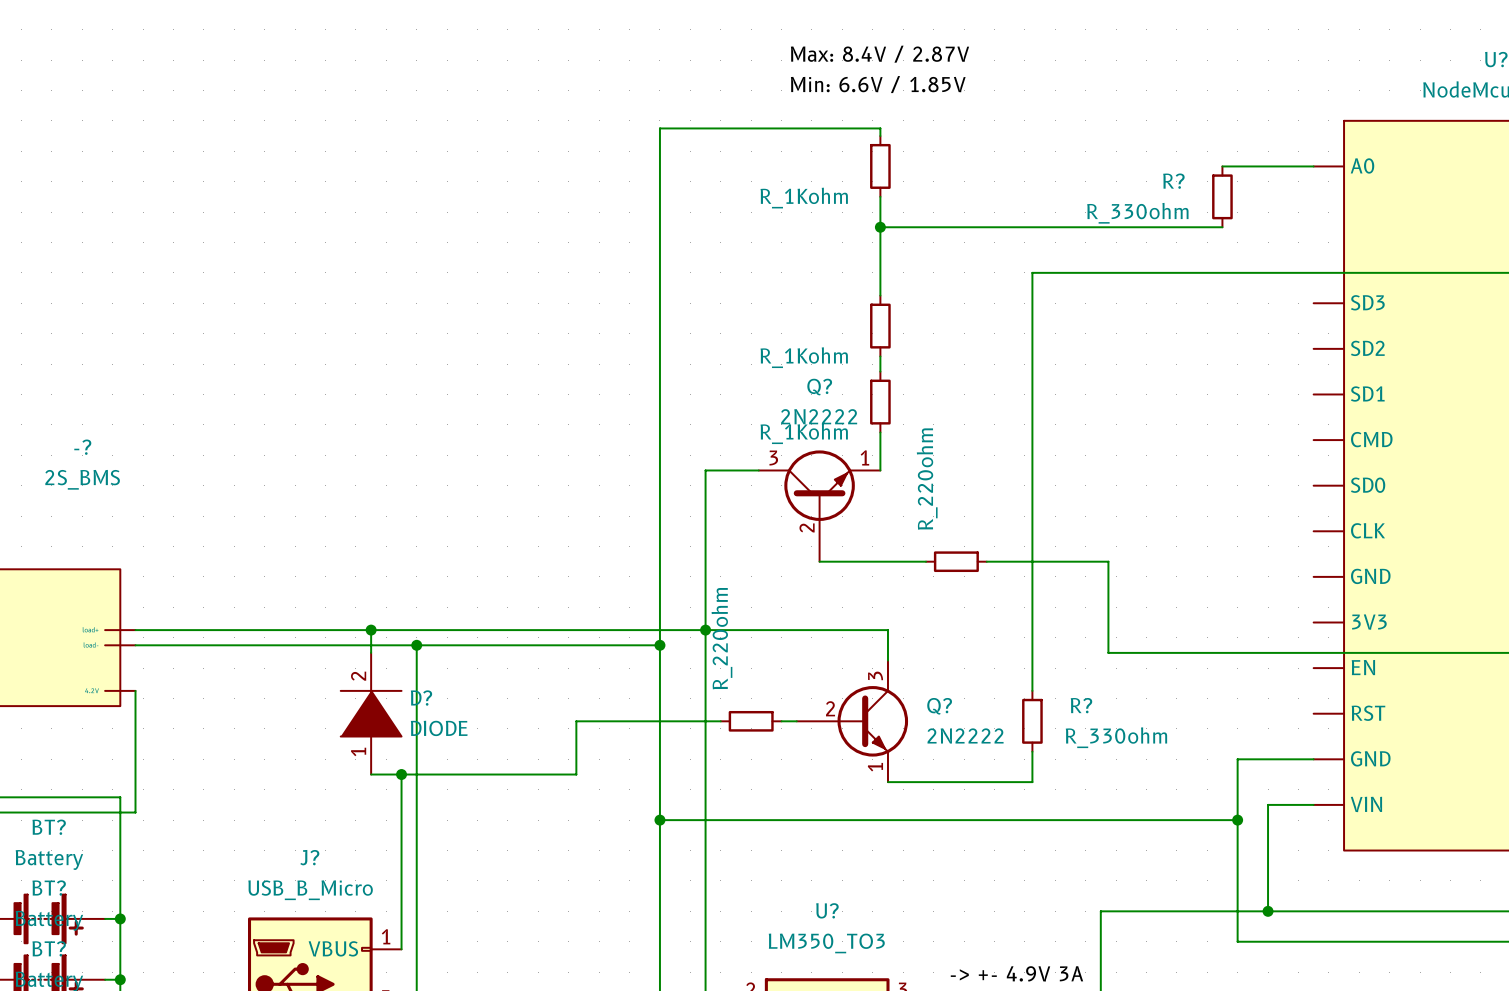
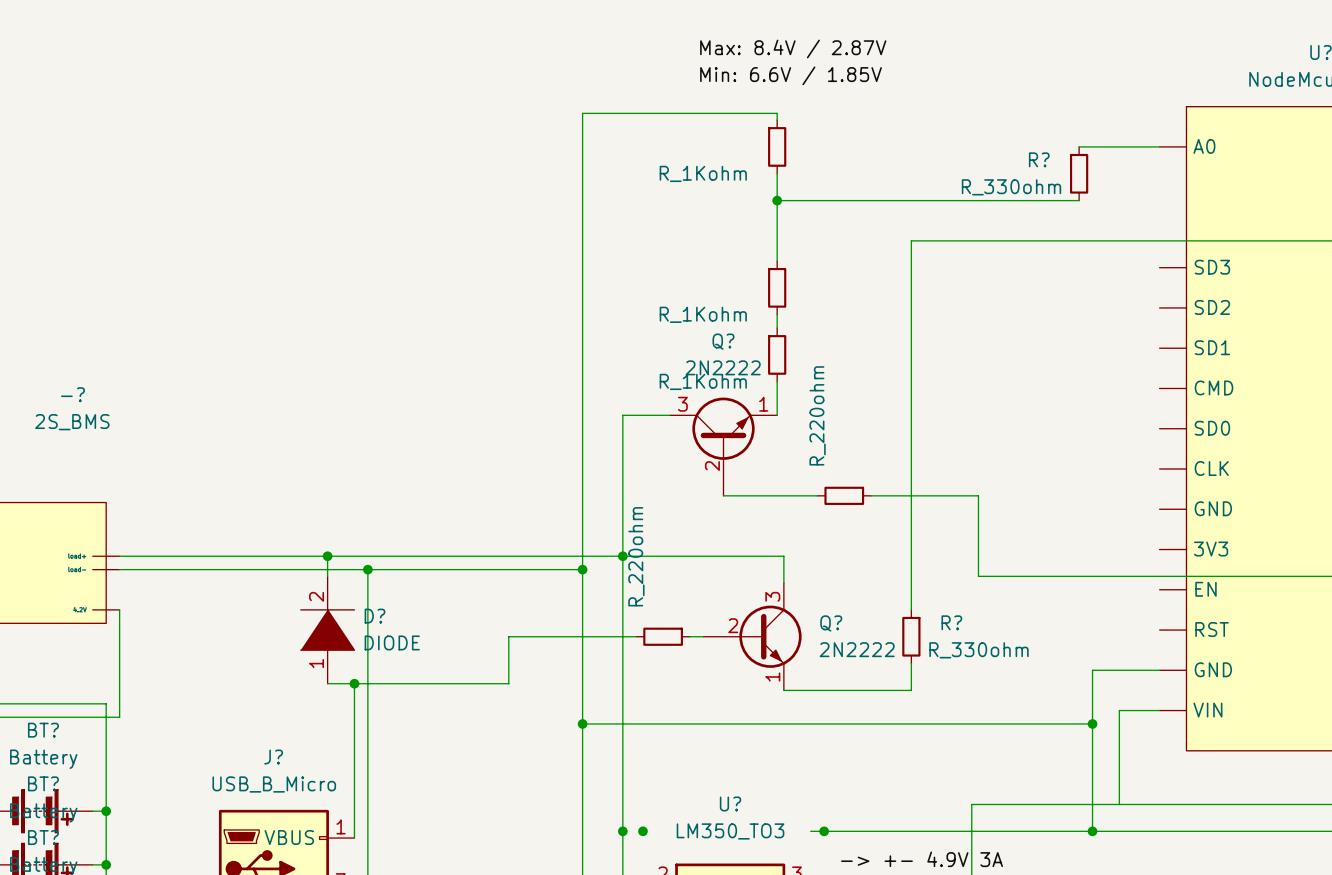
junction position: (1268, 911) -> (1092, 831)
junction: none -> (622, 831)
junction: none -> (642, 831)
wire: none -> (810, 831) (1092, 831)
junction: none -> (824, 831)

